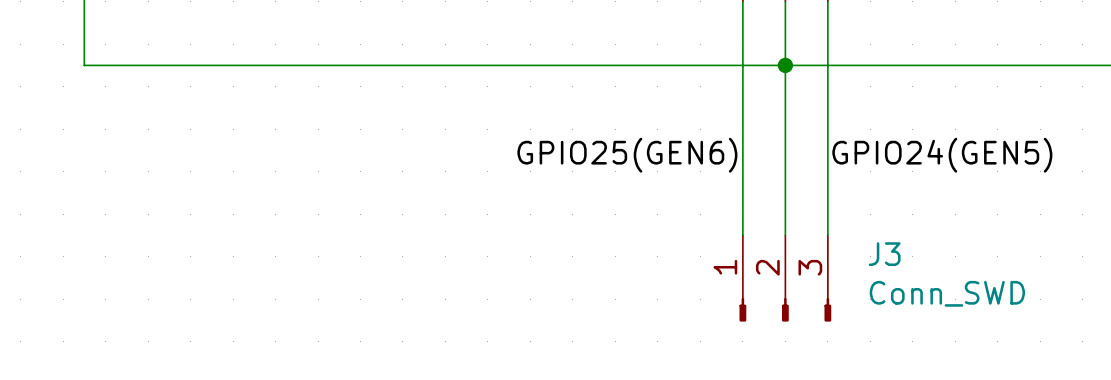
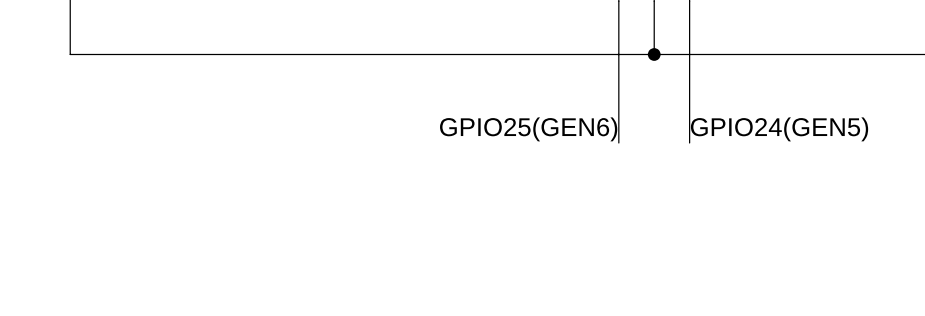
wire: (785, 65) (785, 235) -> none
wire: (742, 171) (742, 235) -> none
wire: (827, 171) (827, 235) -> none
J3: Conn_SWD (785, 278) -> none

